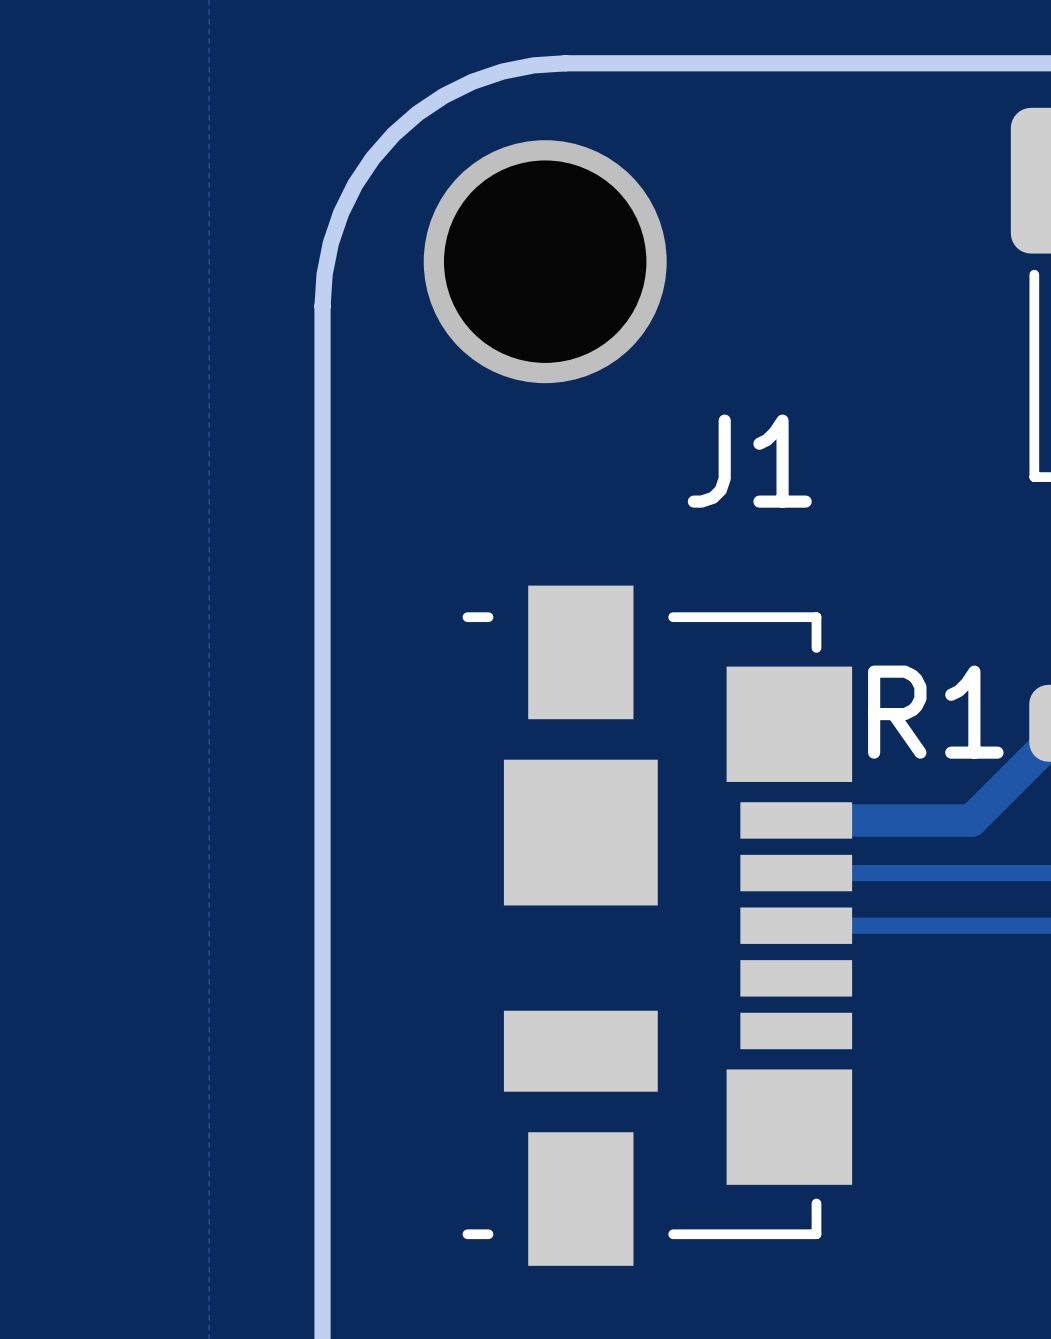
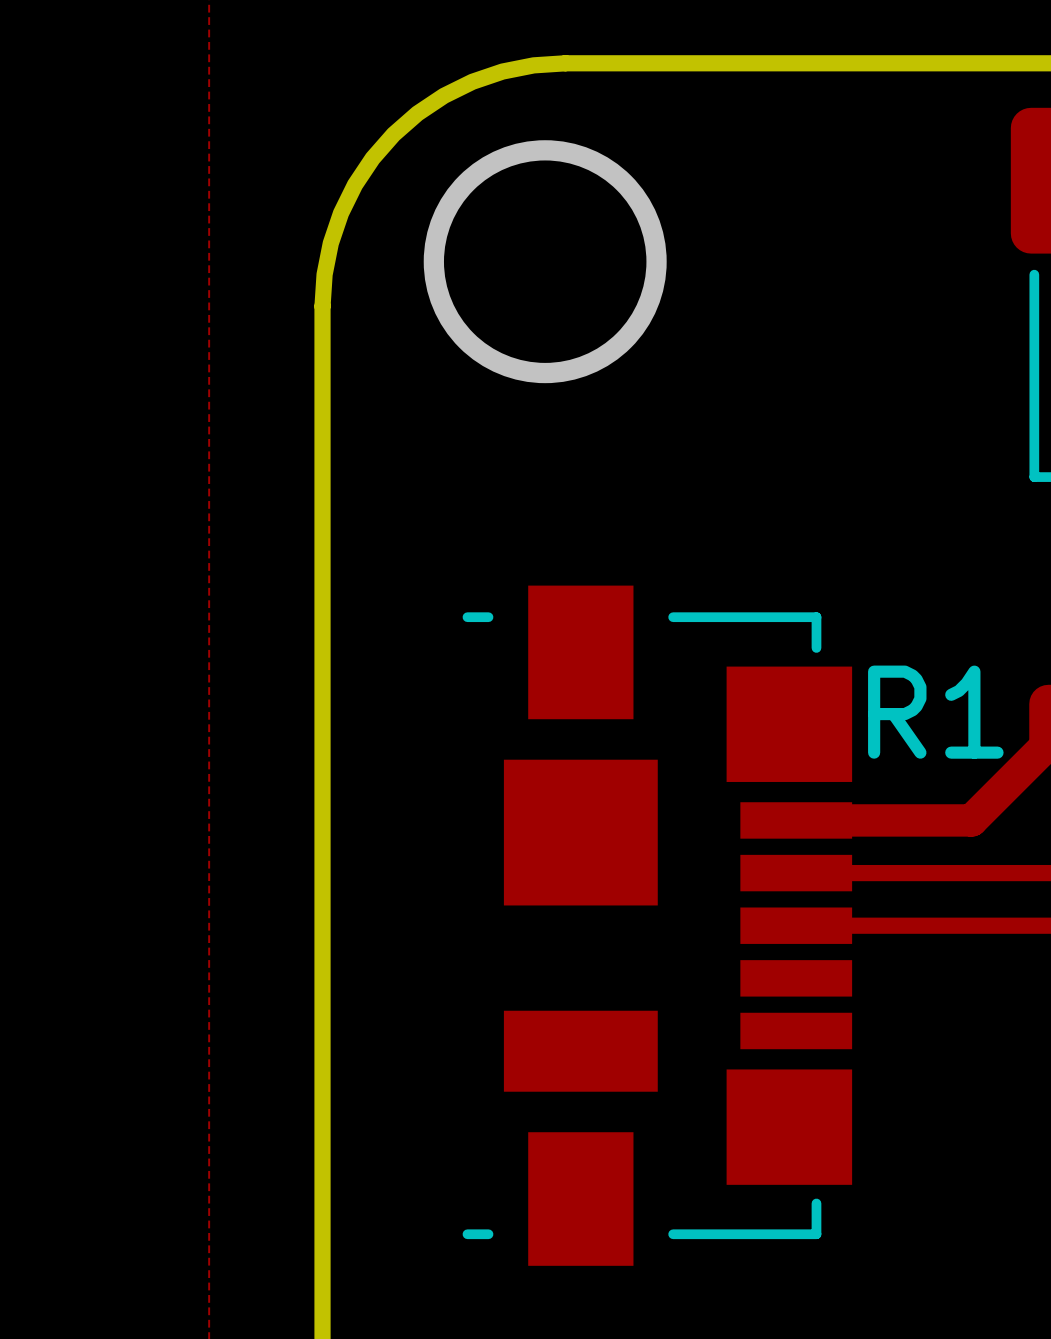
J1 name: J1 (749, 461) -> none

